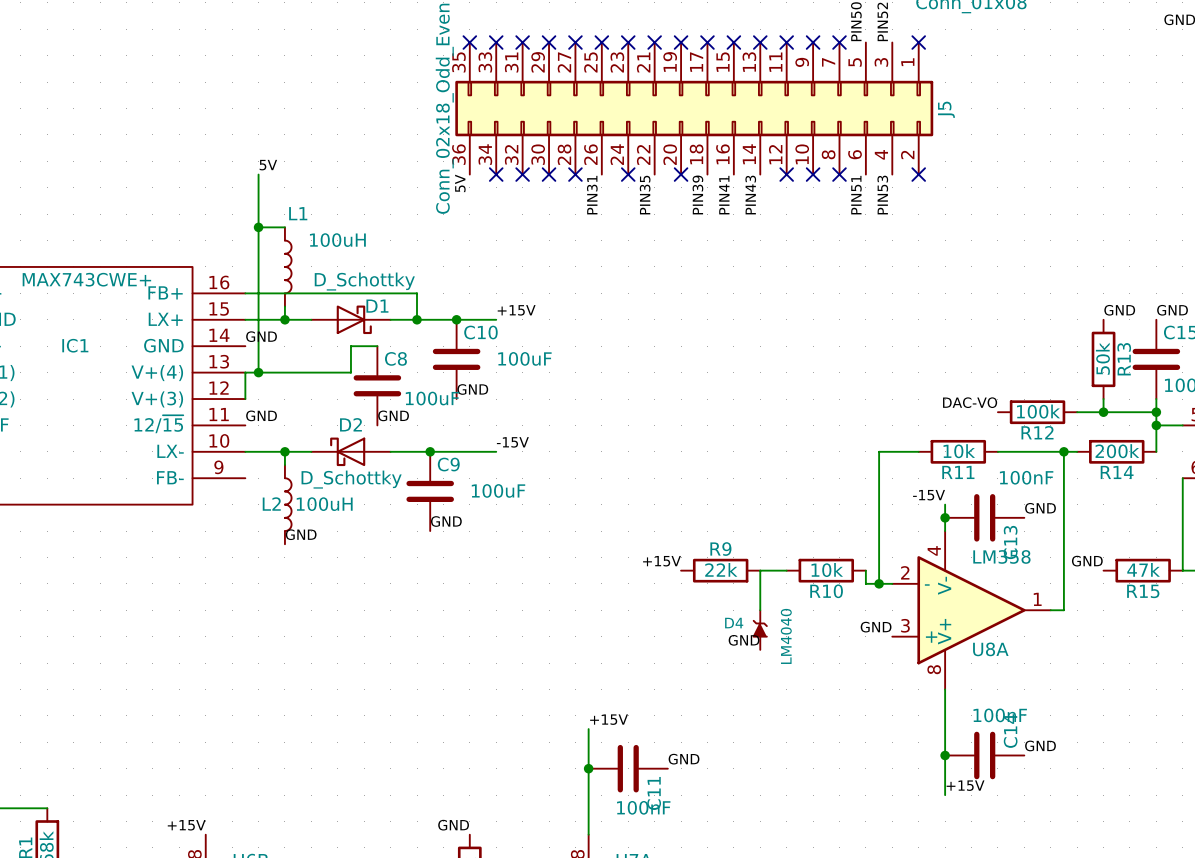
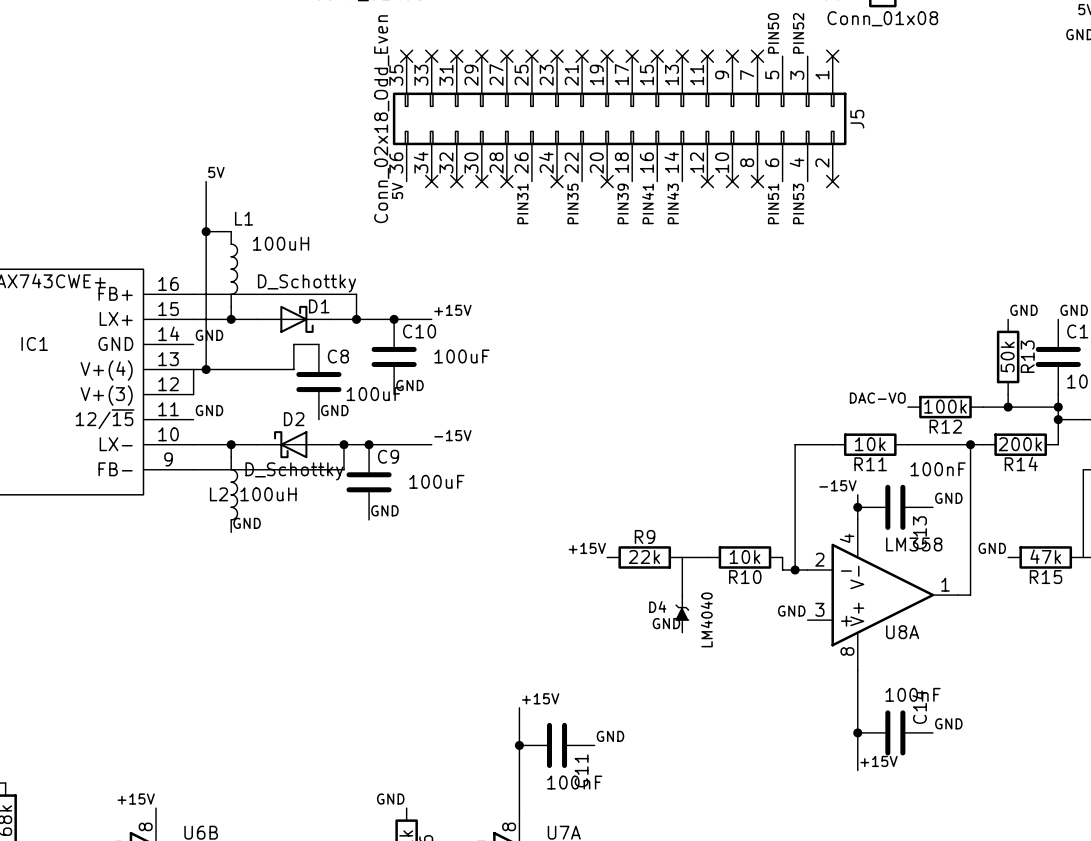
wire: none -> (343, 444) (343, 469) (193, 469)
junction: none -> (343, 444)

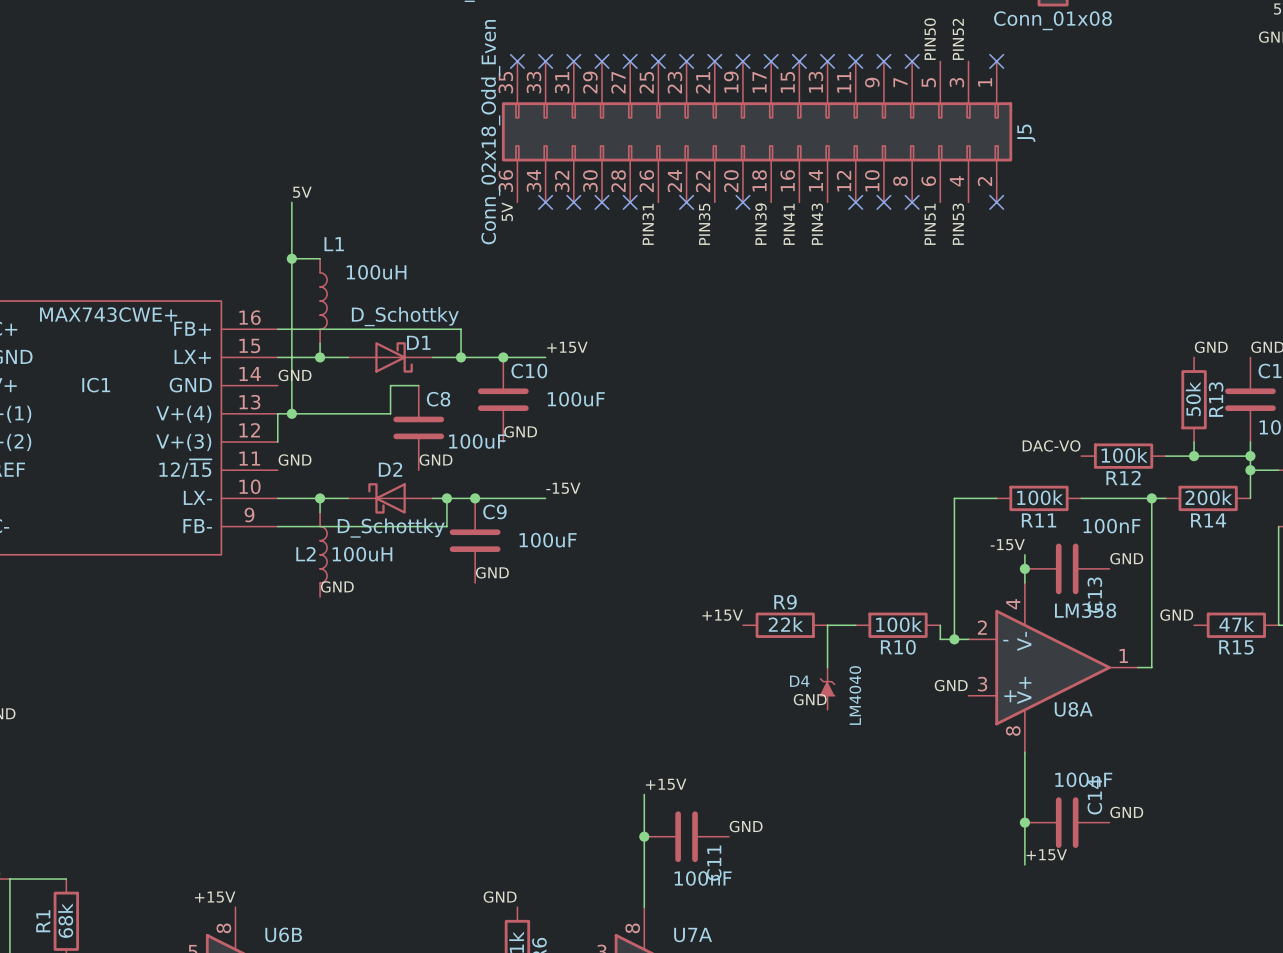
R11 value: 10k (870, 444) -> 100k (1040, 497)
R10 value: 10k (744, 557) -> 100k (899, 624)

